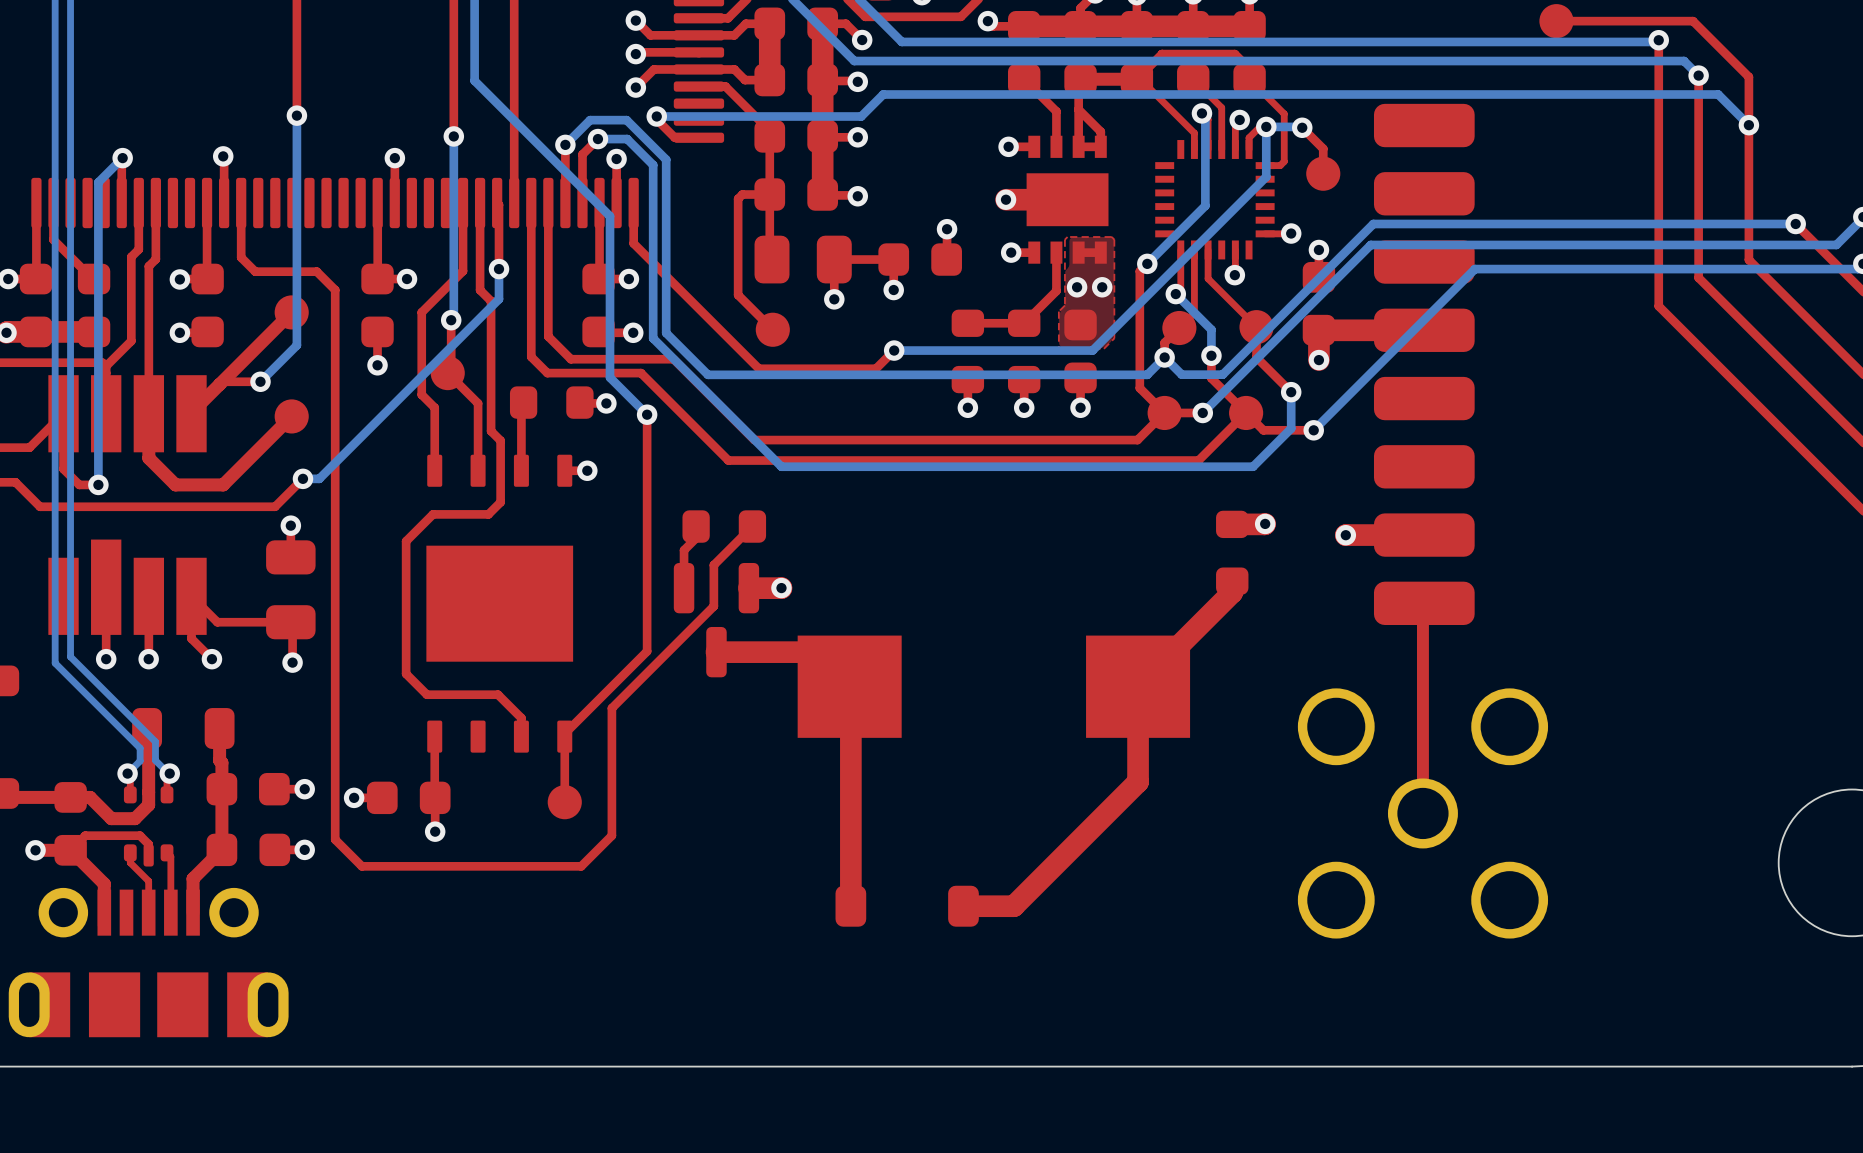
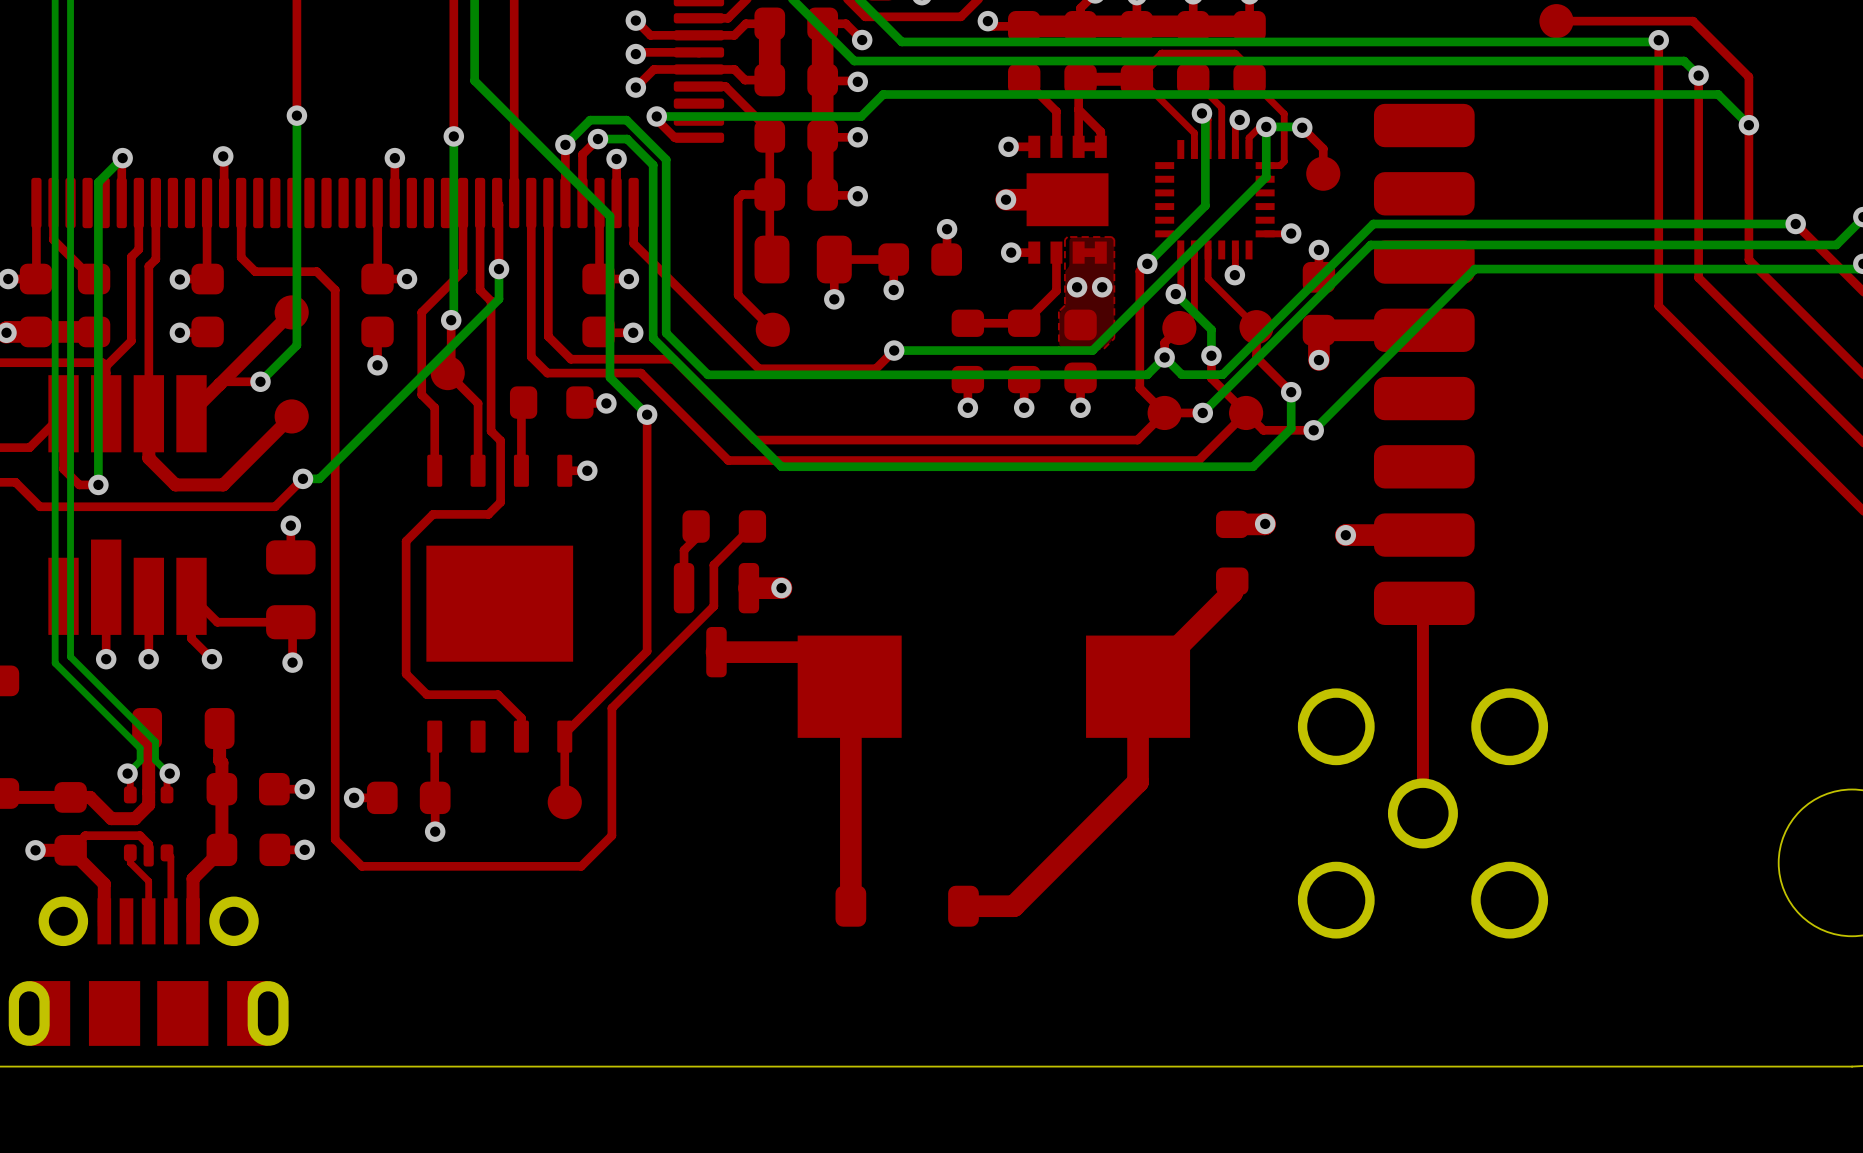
part footprint: [8, 887, 289, 1038] -> [8, 896, 289, 1046]

